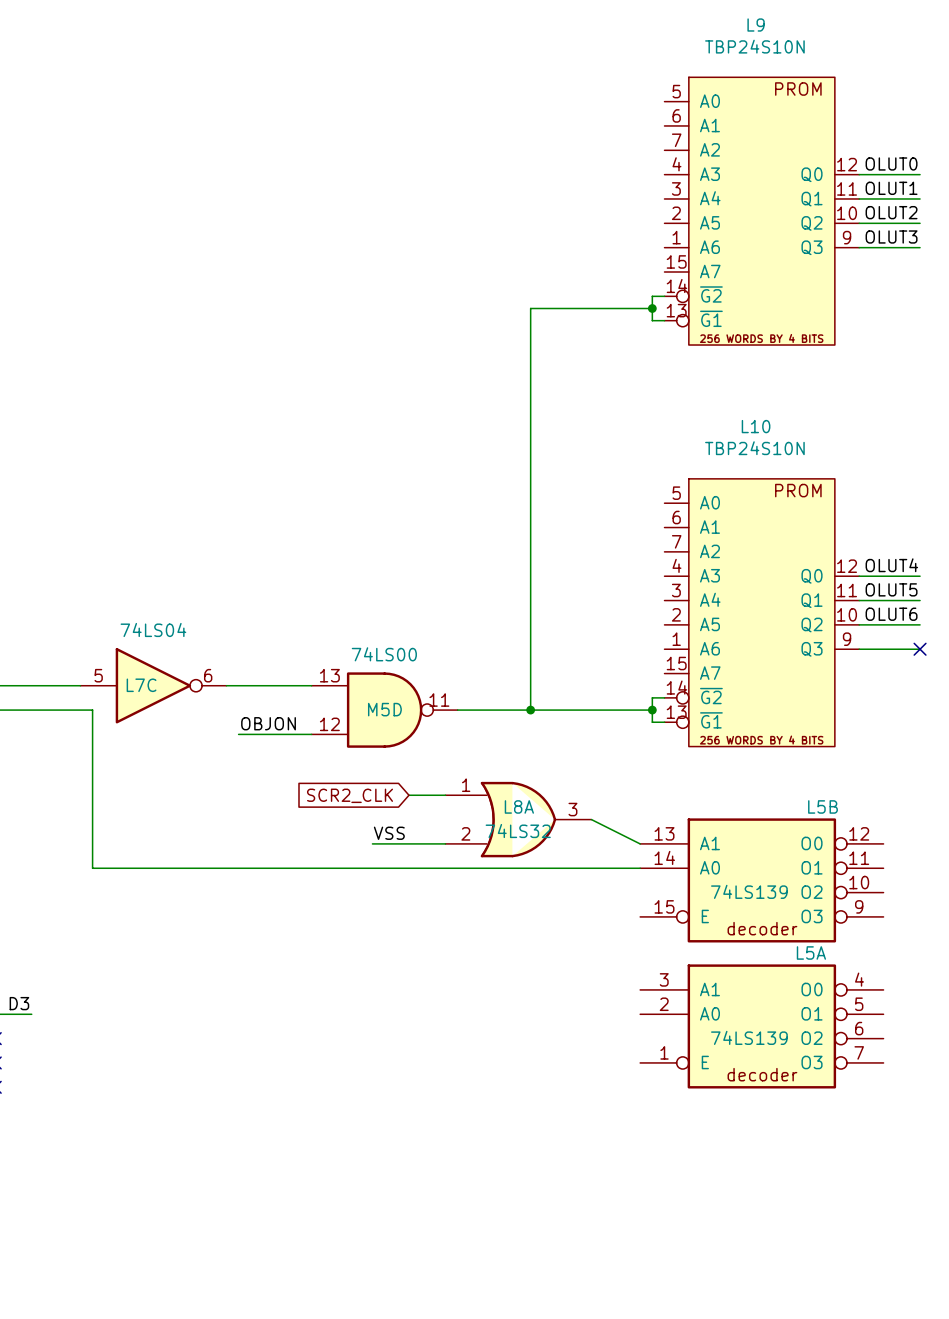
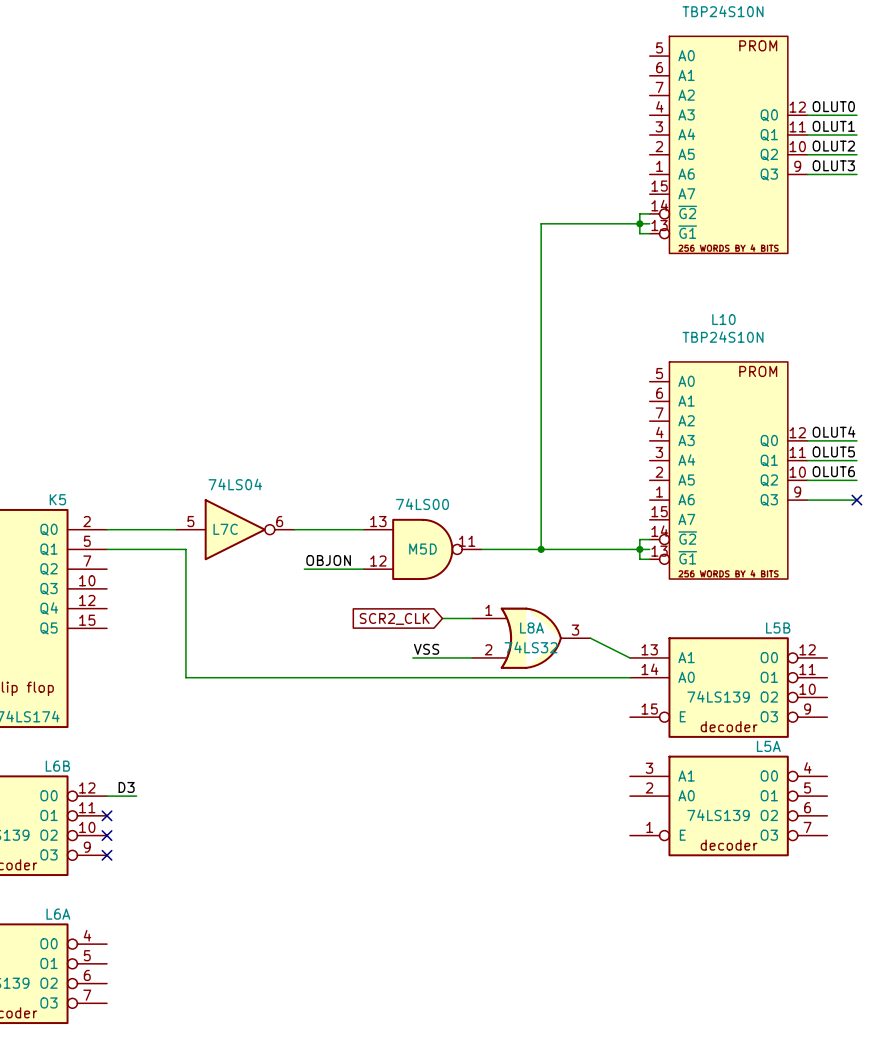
wire: none -> (639, 223) (649, 223)
wire: none -> (639, 549) (649, 549)

